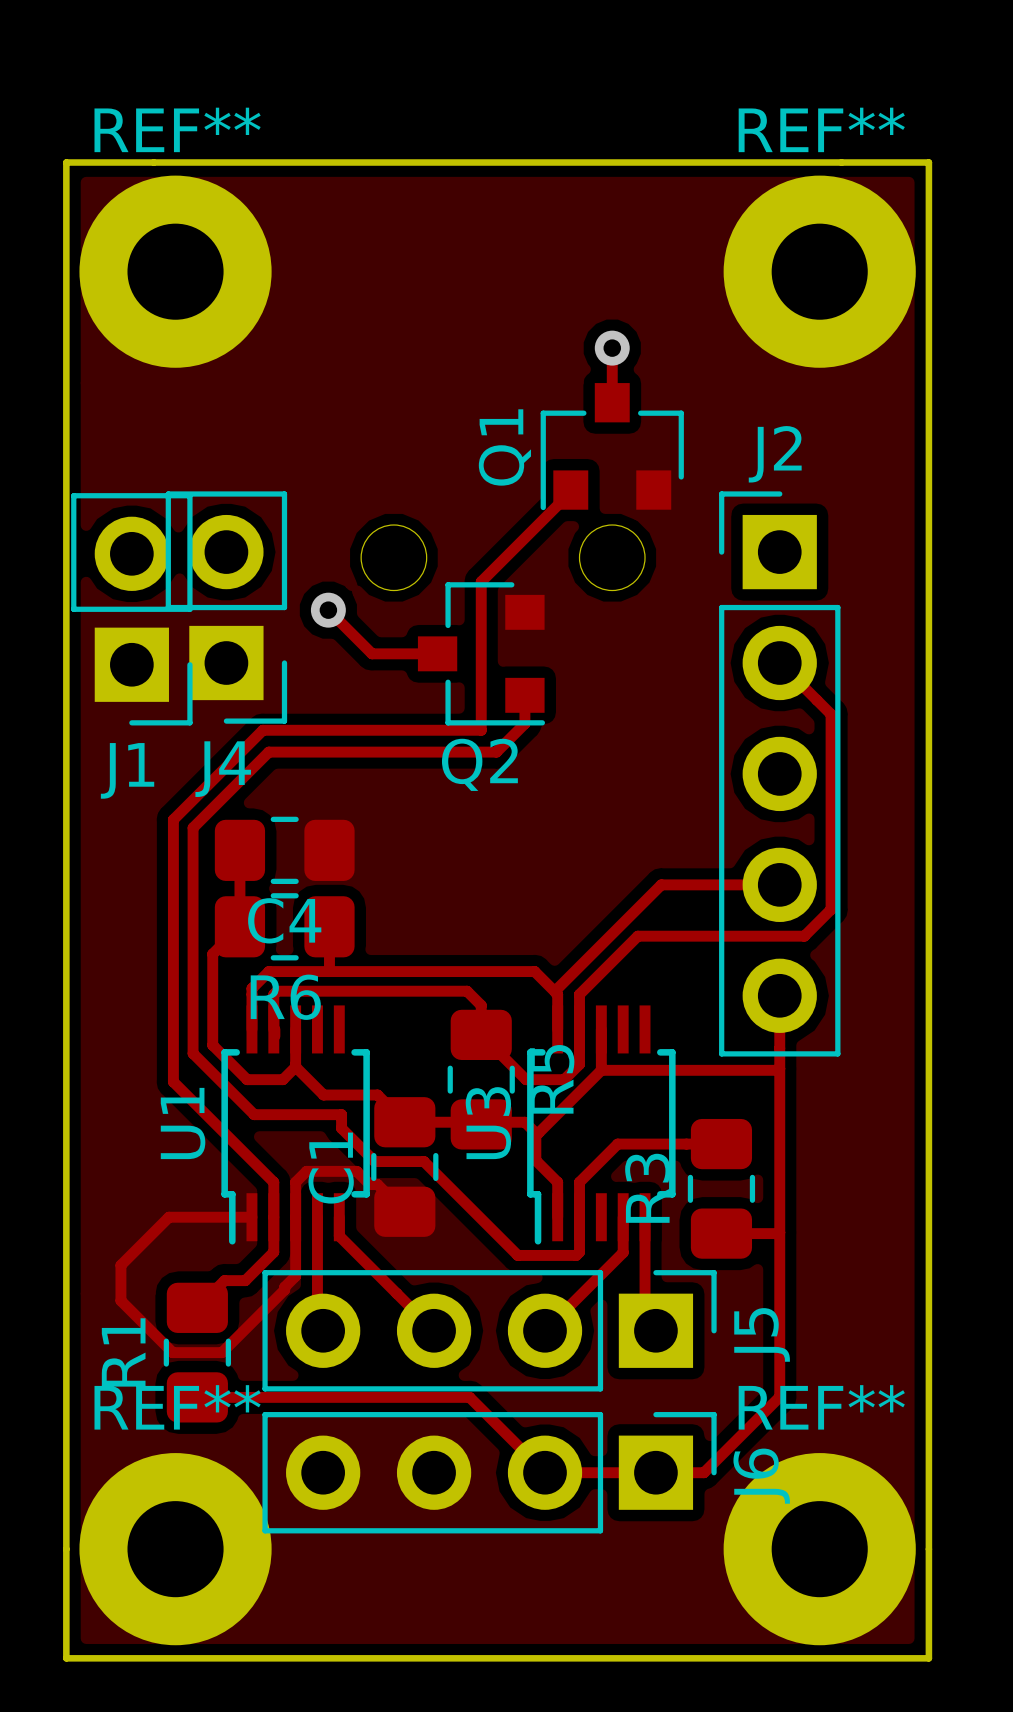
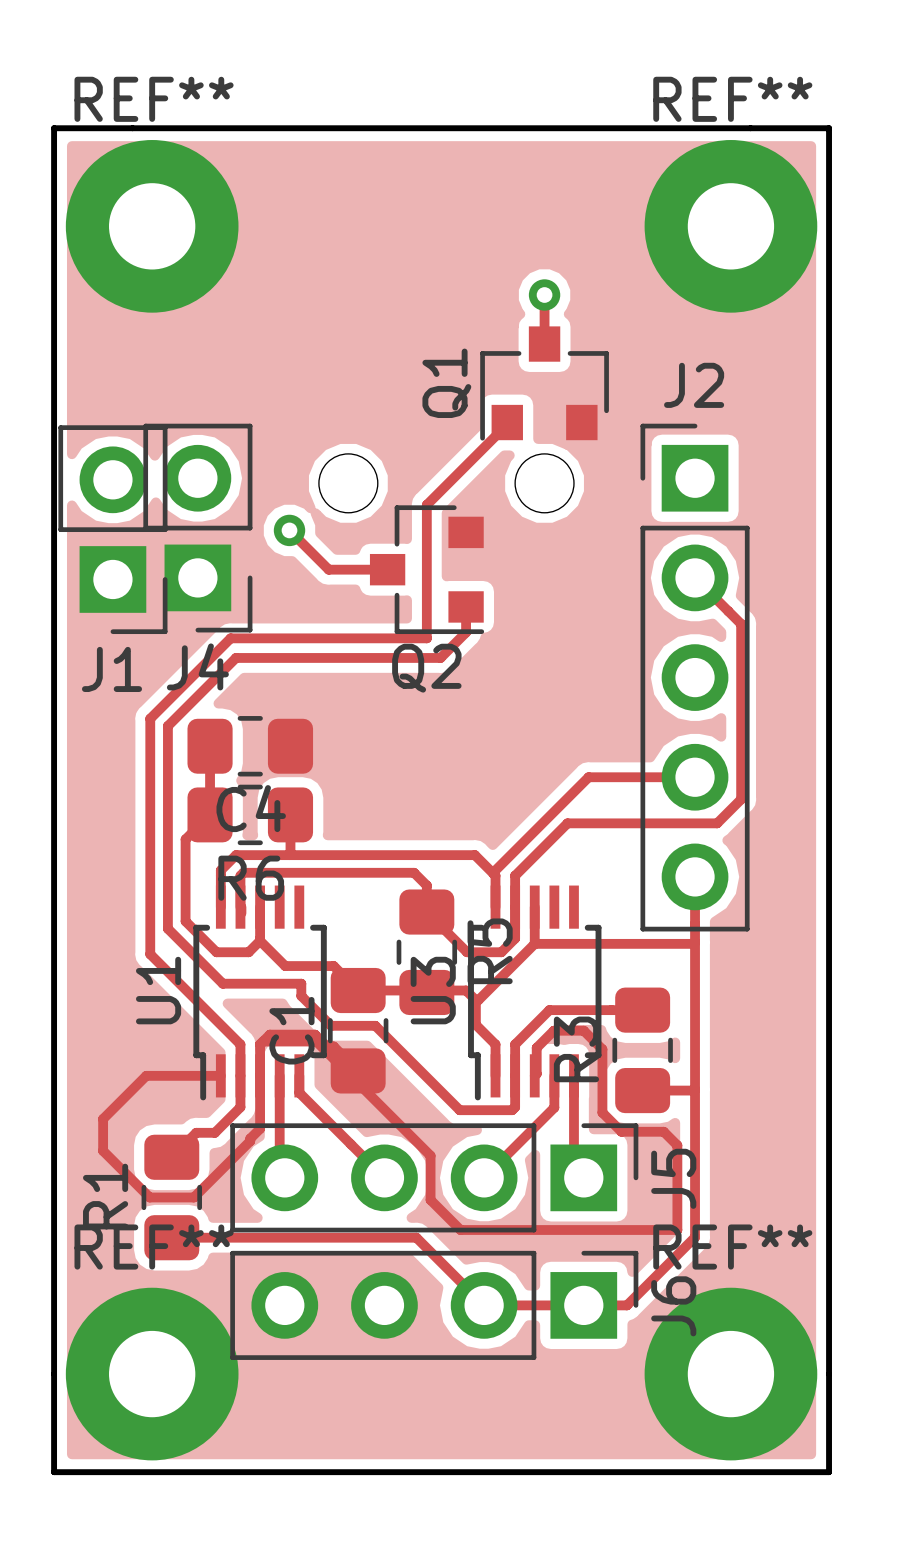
track: none -> (263, 1041) (316, 1041) (430, 1155) (430, 1200) (460, 1230) (677, 1230) (677, 1145) (663, 1131) (621, 1131) (602, 1112) (602, 1049) (583, 1030) (553, 1030) (536, 1047) (536, 1073) (534, 1075)

